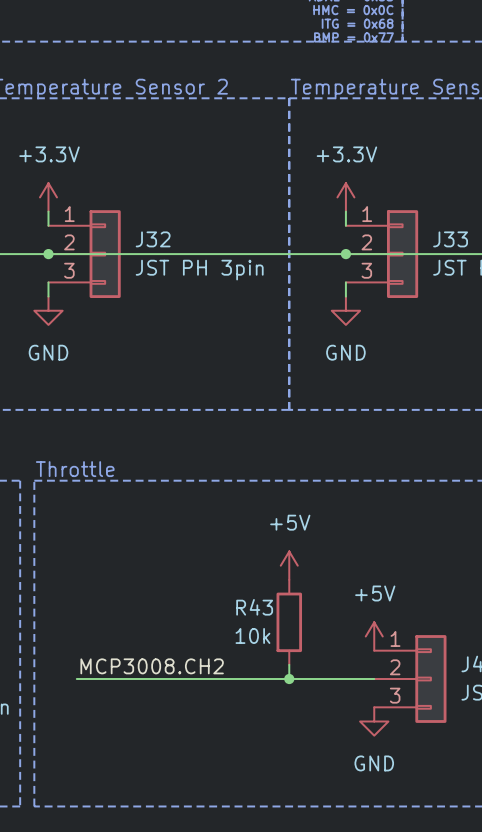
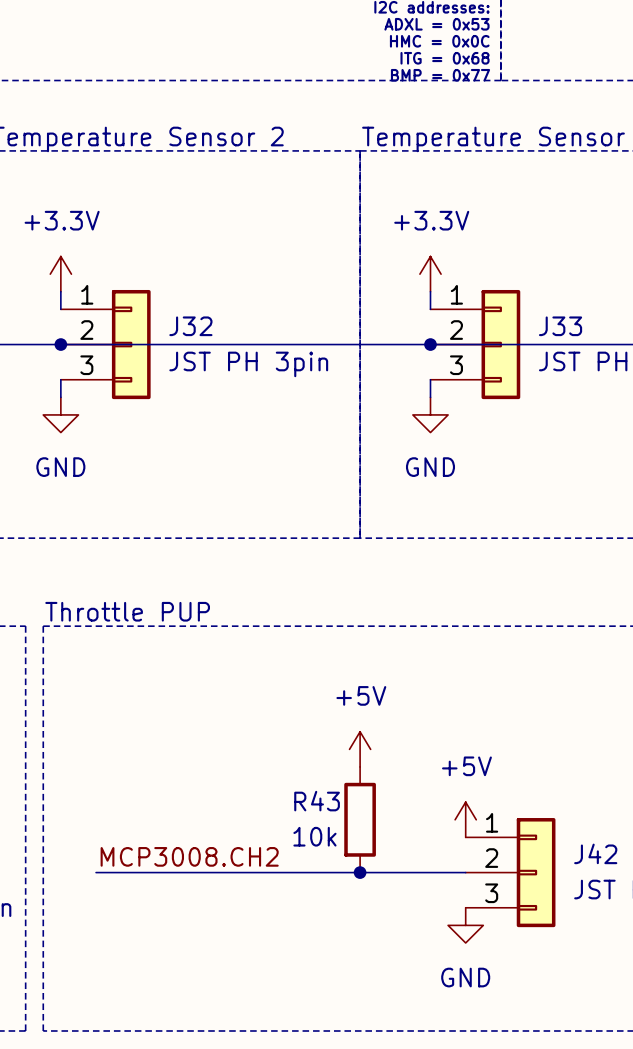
text: Throttle (75, 469) -> Throttle PUP (127, 611)
power symbol position: +5V (289, 565) -> +5V (360, 749)
R43 position: (289, 622) -> (360, 819)

